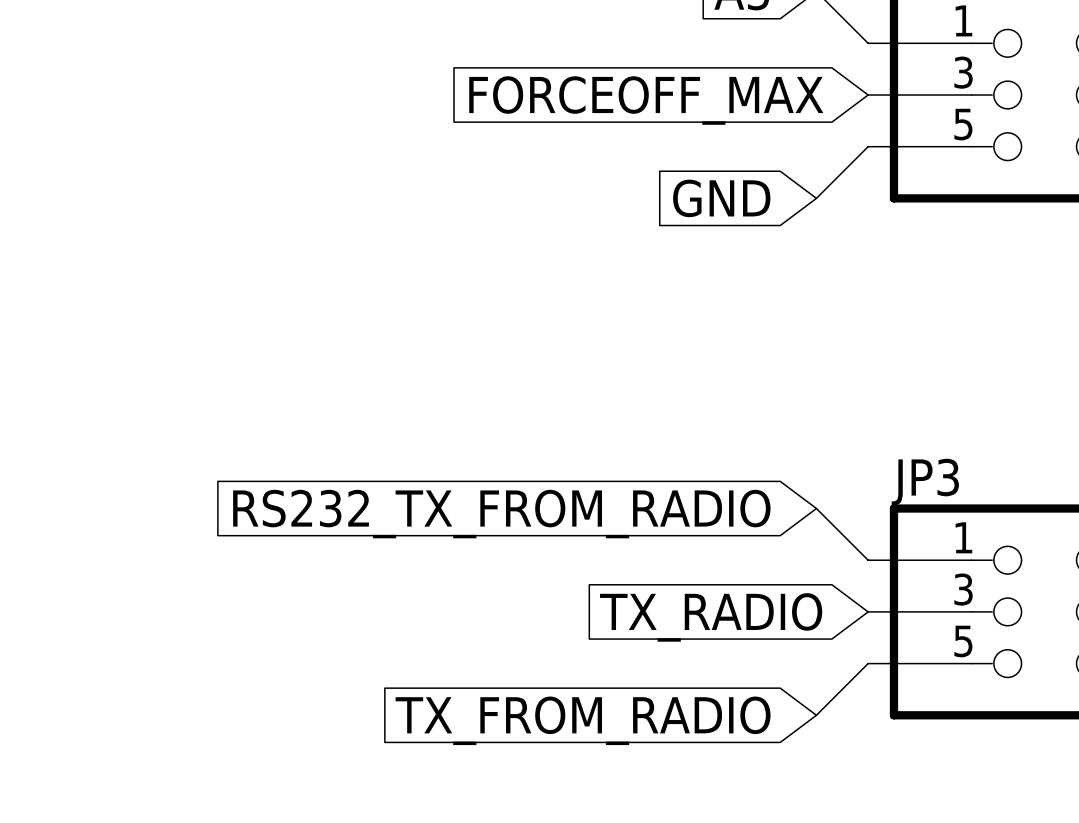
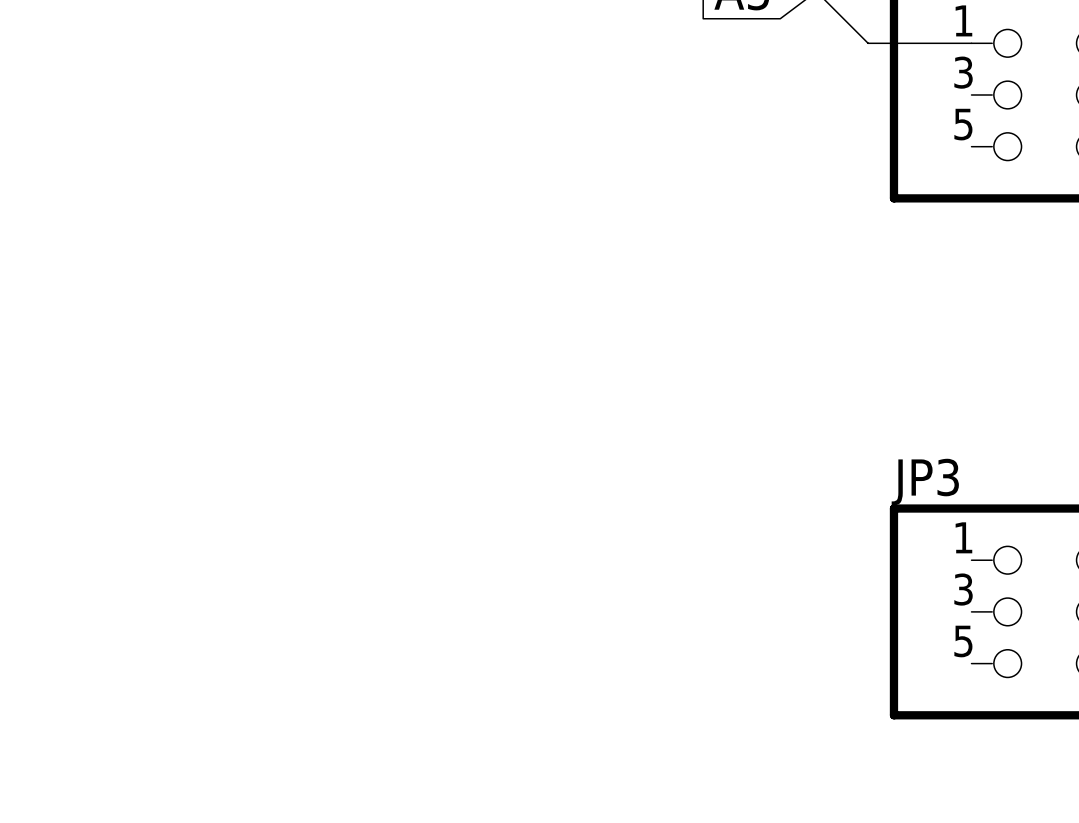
wire: (868, 95) (971, 95) -> none
global label: FORCEOFF_MAX (646, 100) -> none
wire: (971, 146) (868, 146) (816, 198) -> none
global label: GND (721, 198) -> none
wire: (816, 508) (868, 560) (971, 560) -> none
global label: RS232_TX_FROM_RADIO (501, 514) -> none
wire: (868, 611) (971, 611) -> none
global label: TX_RADIO (711, 617) -> none
wire: (971, 663) (868, 663) (816, 715) -> none
global label: TX_FROM_RADIO (583, 720) -> none

